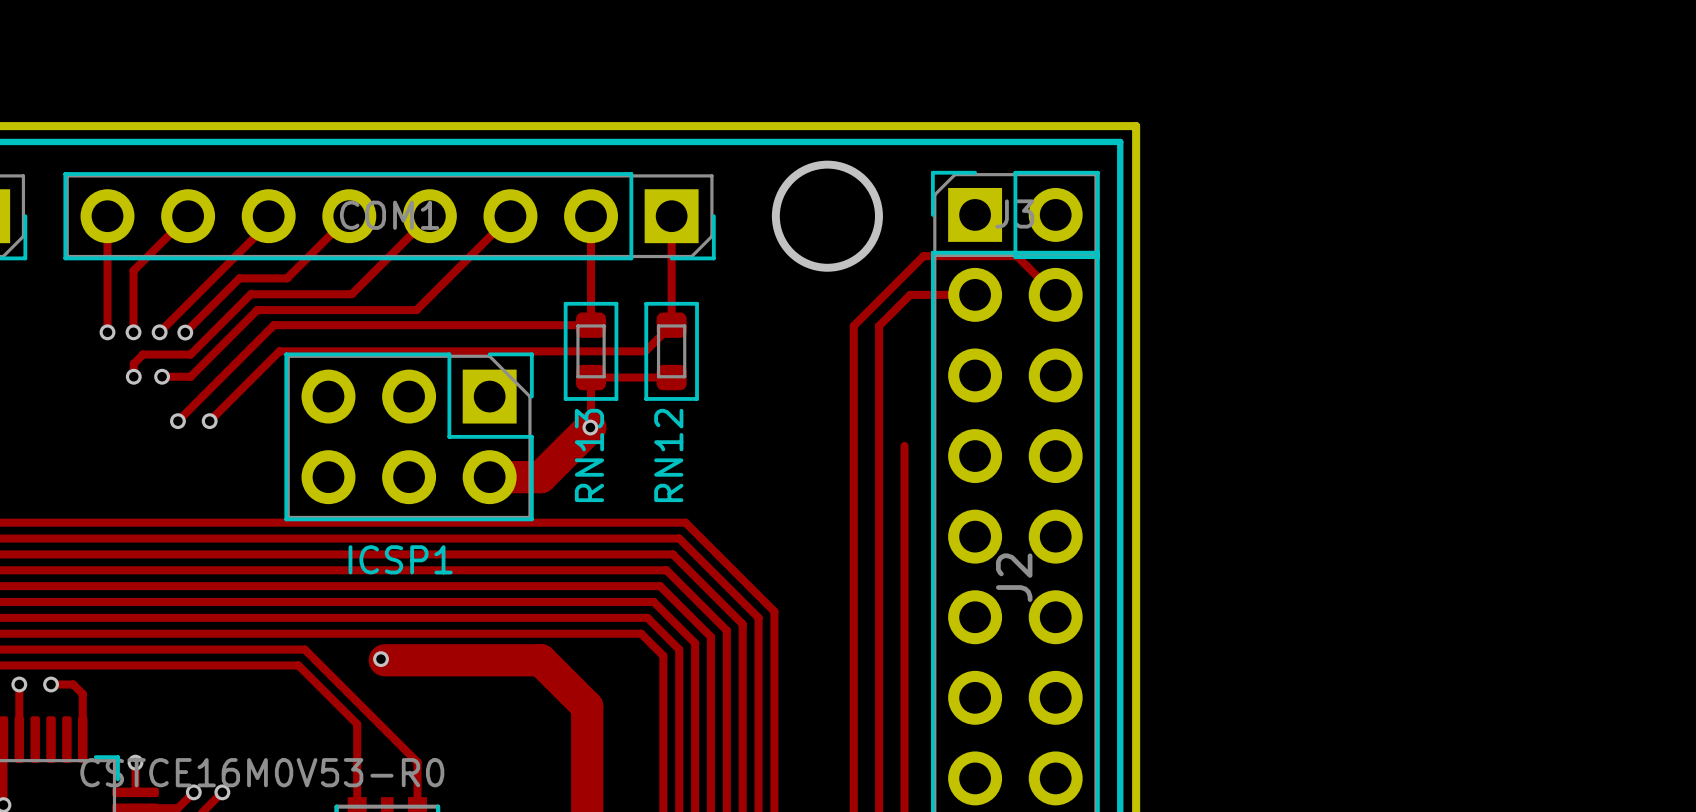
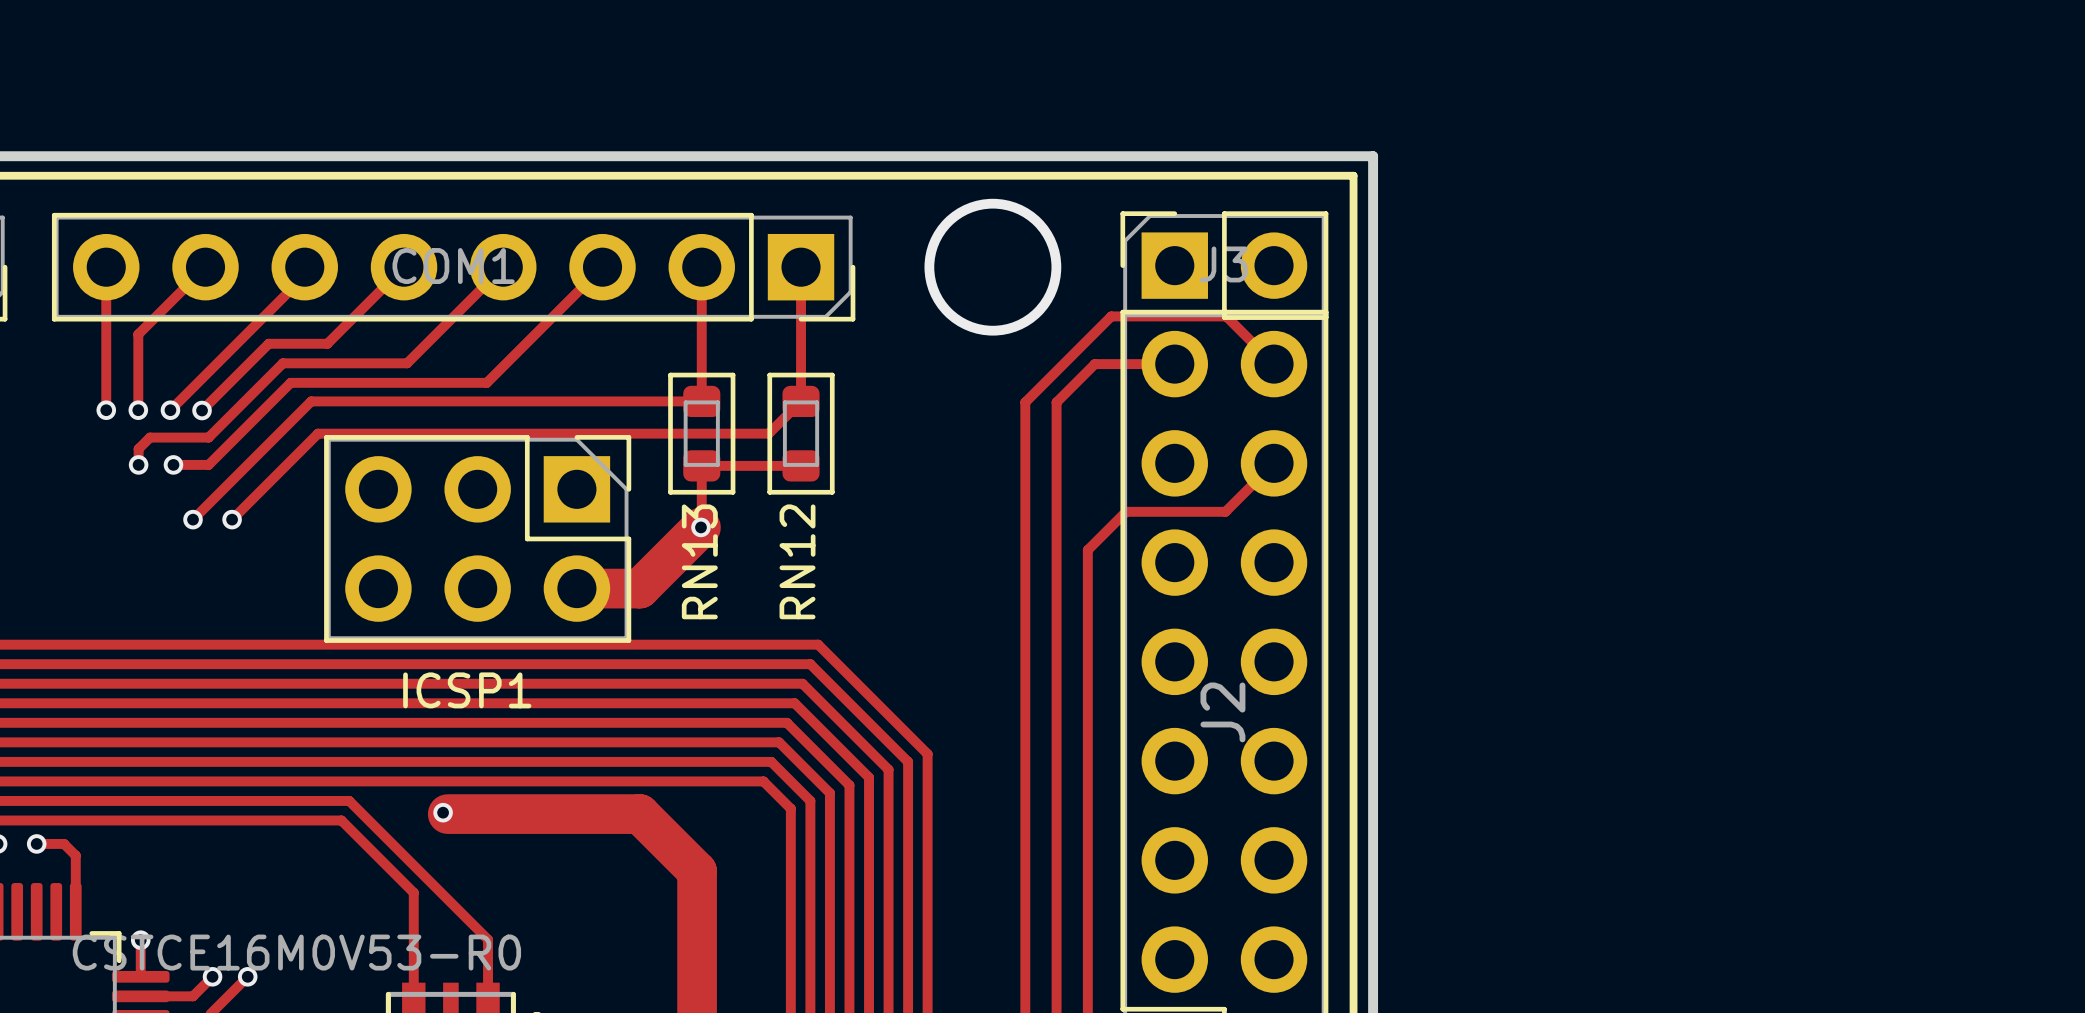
track: none -> (1274, 463) (1225, 511) (1126, 511) (1087, 550)

